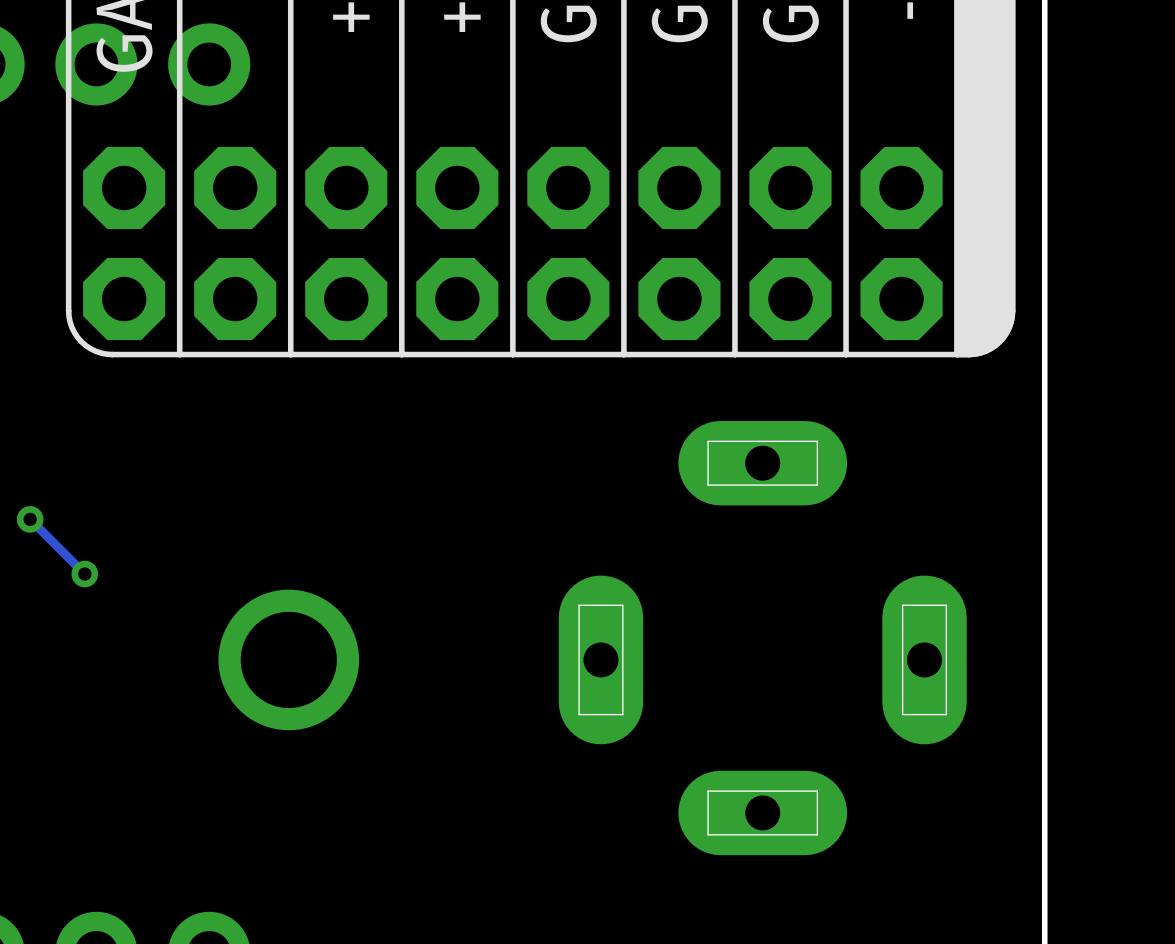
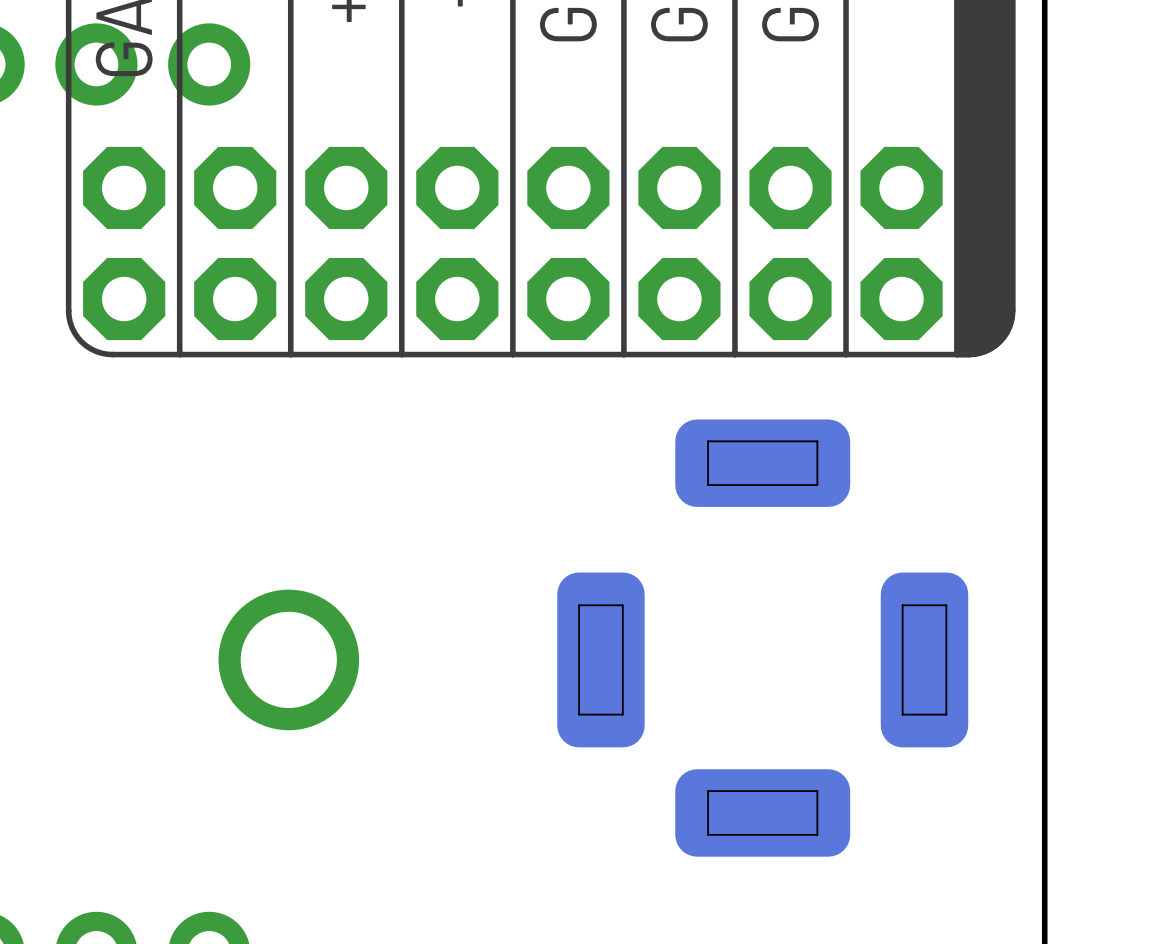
part footprint: [558, 421, 967, 856] -> [557, 419, 969, 857]
track: (30, 519) (84, 574) -> none
via: (30, 519) -> none
via: (84, 574) -> none

